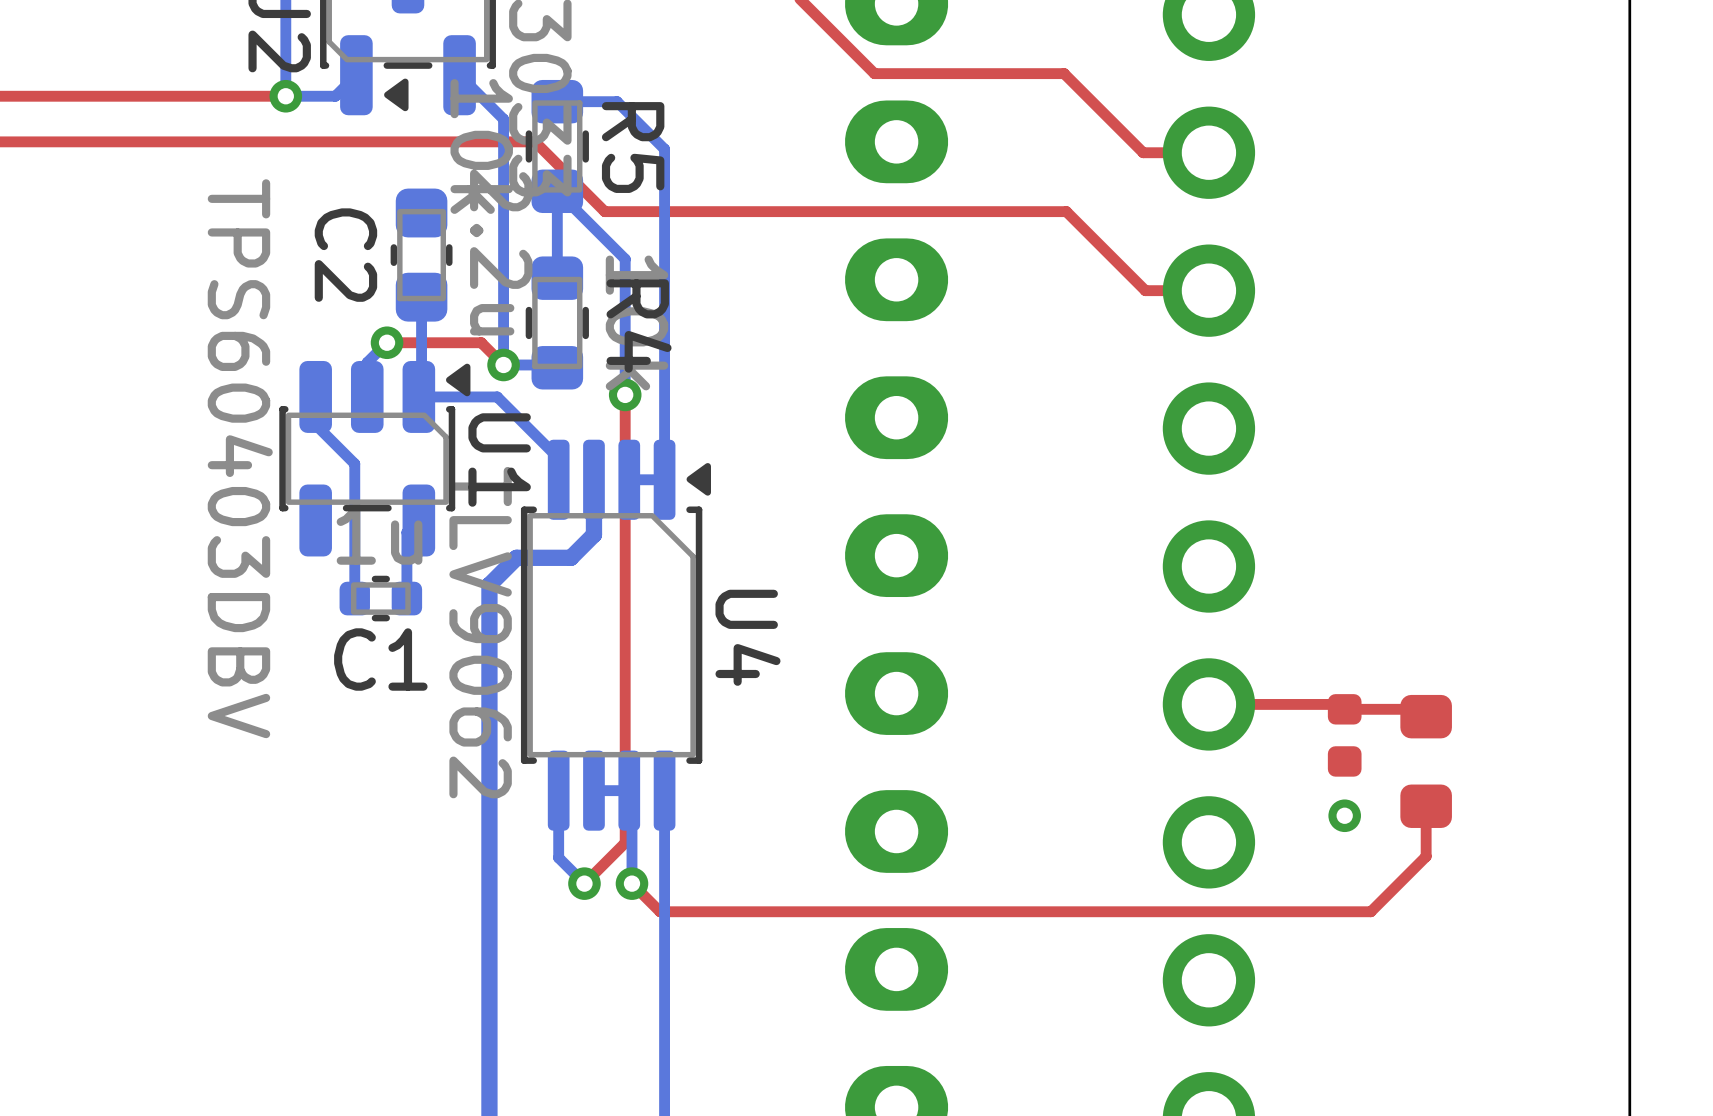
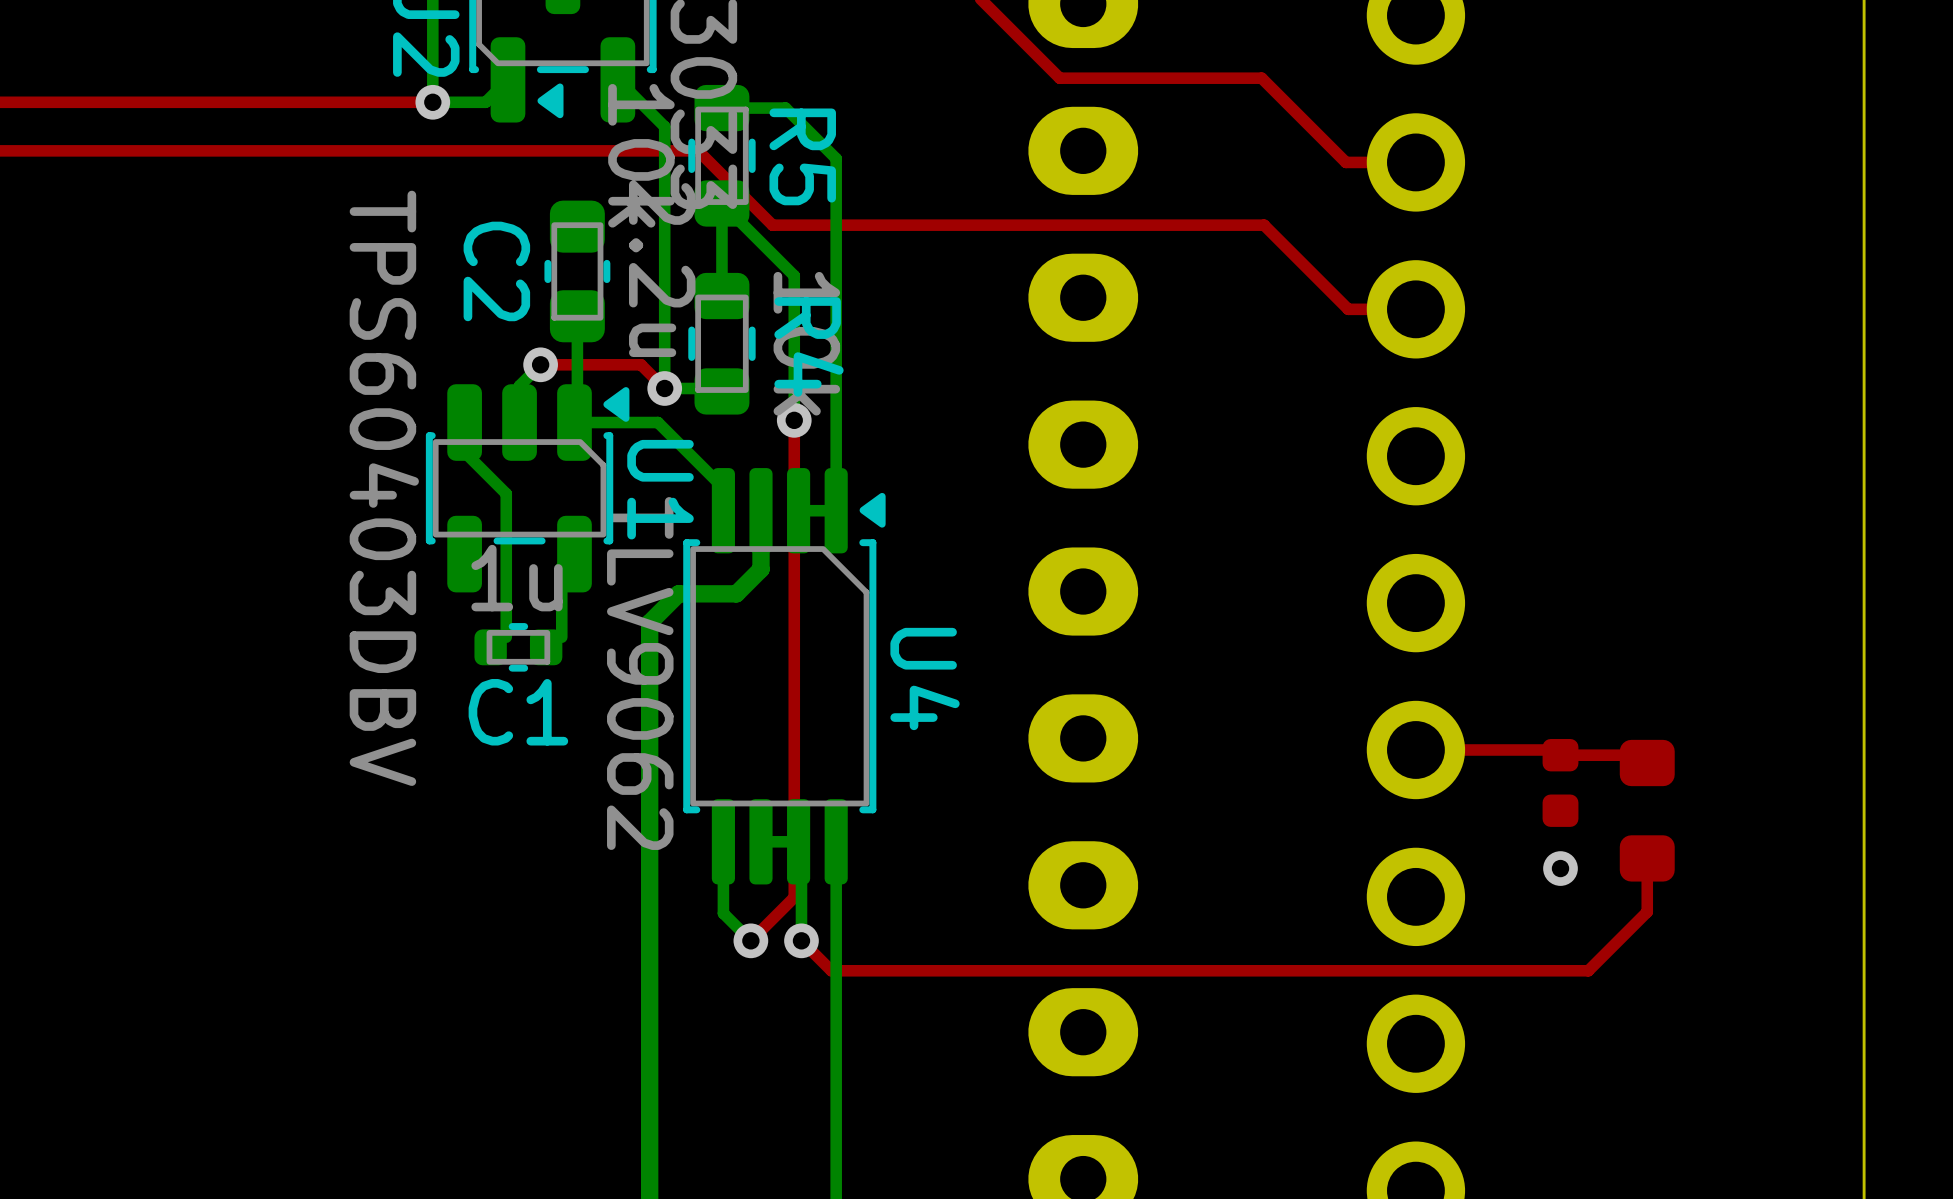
C1 position: (380, 598) -> (518, 647)

